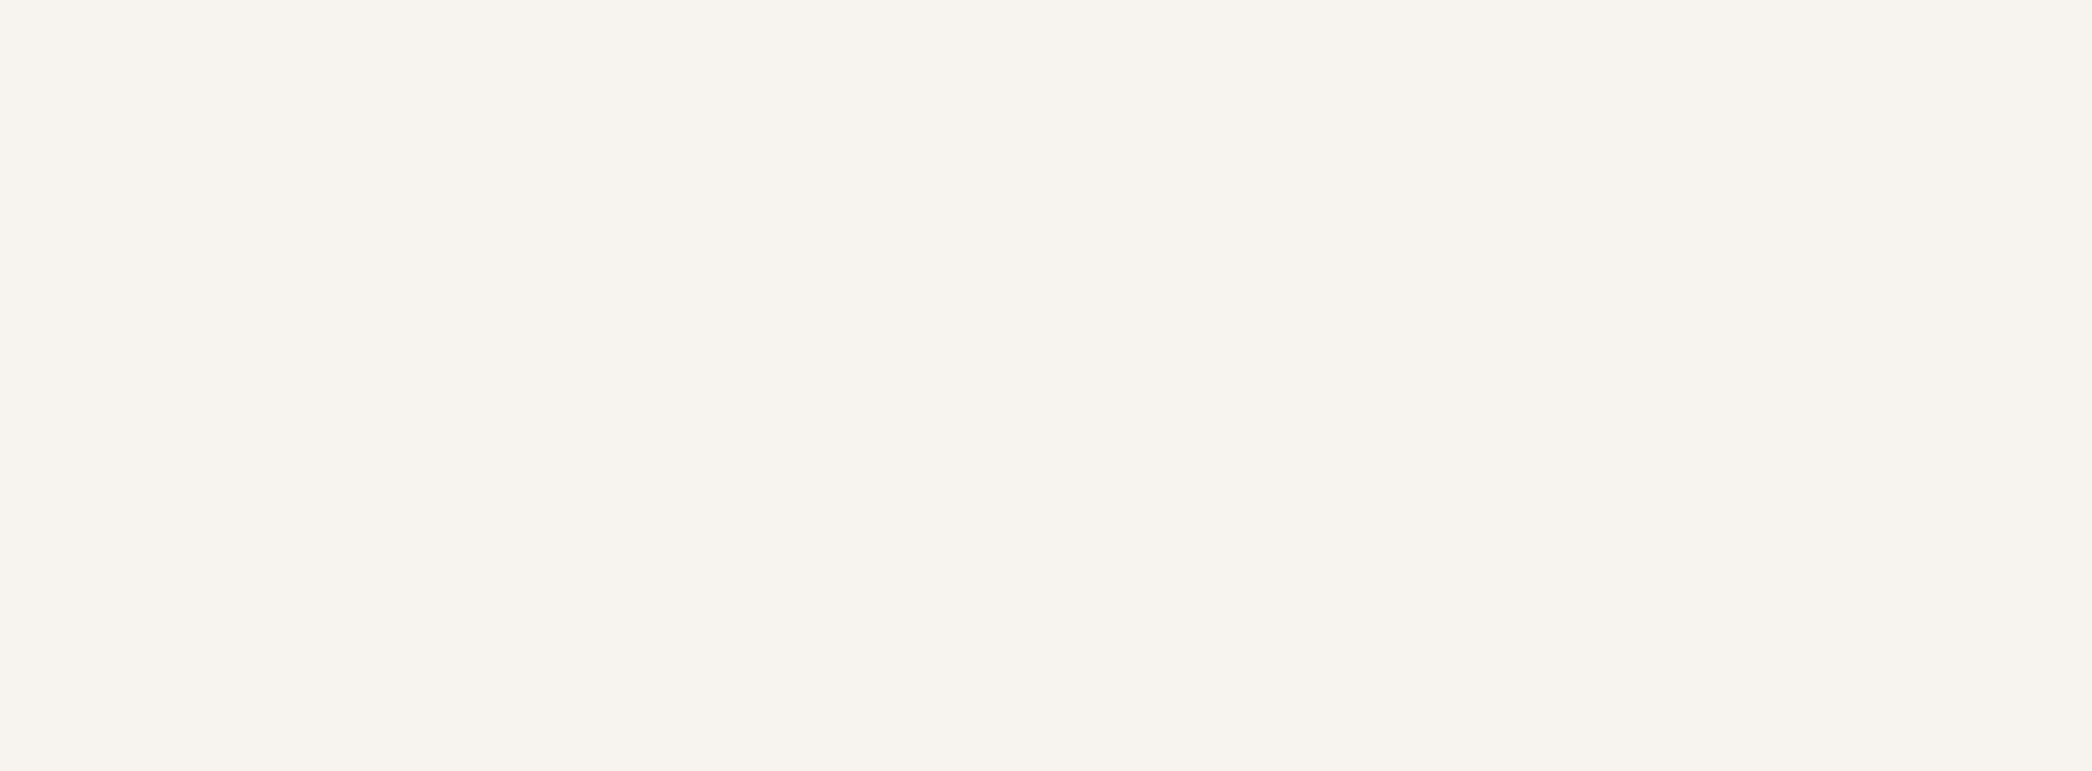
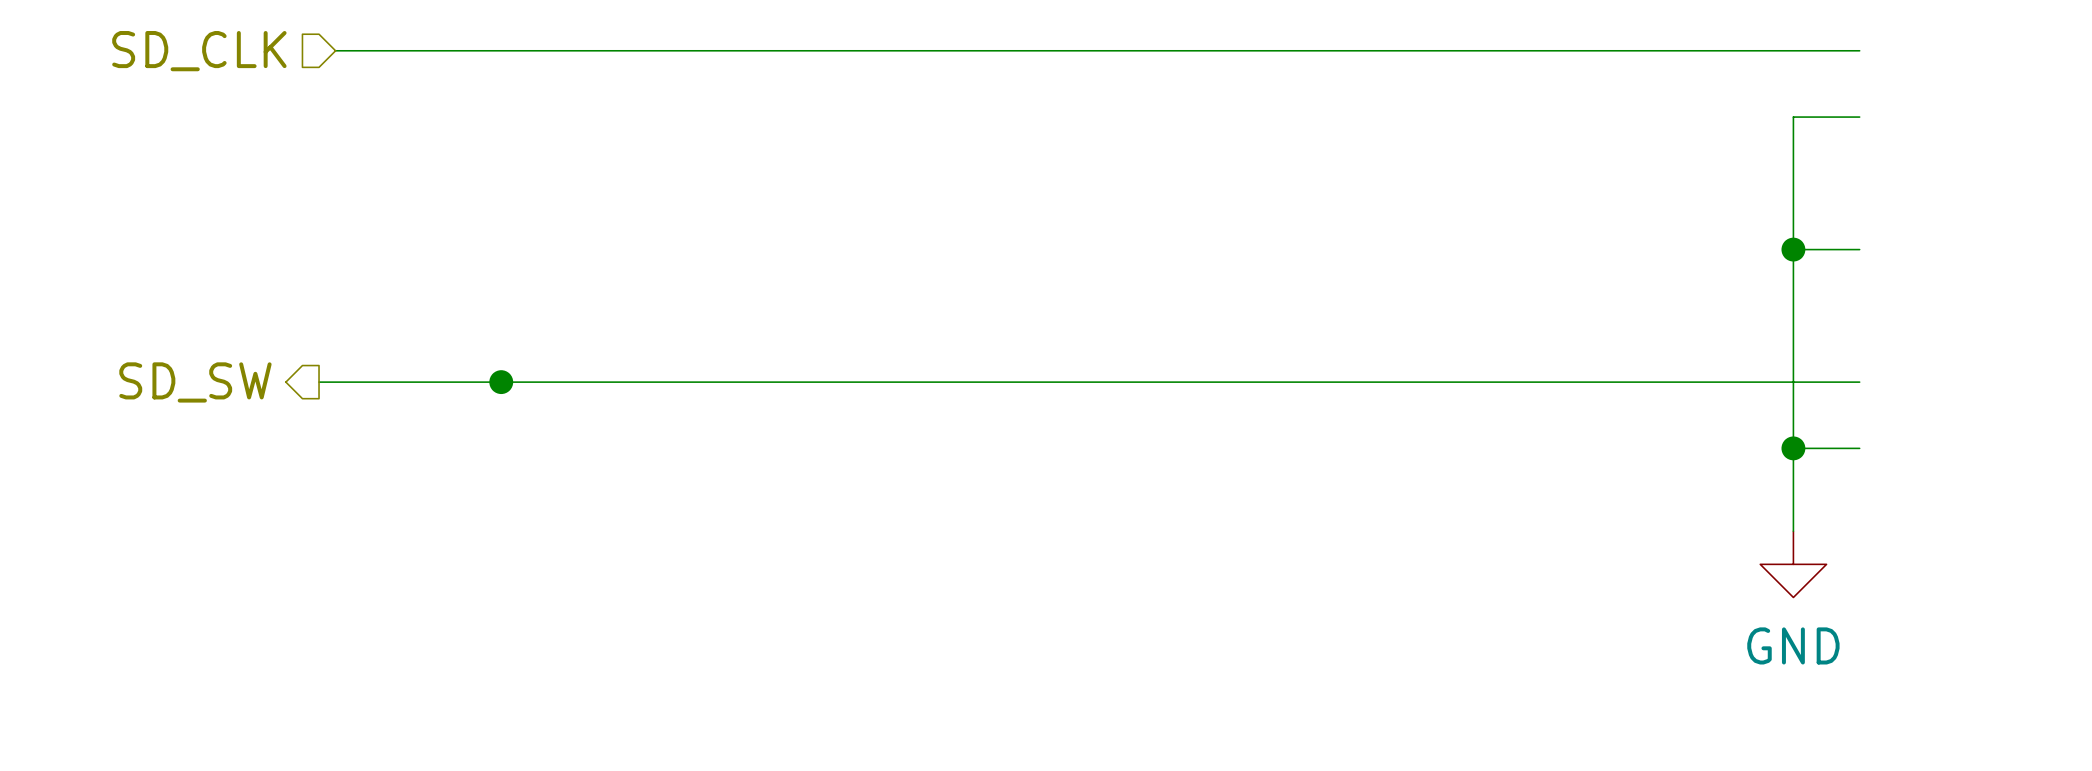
wire: none -> (335, 50) (1859, 50)
hierarchical label: none -> SD_CLK (199, 51)
wire: none -> (1859, 117) (1793, 117) (1793, 531)
wire: none -> (1793, 249) (1859, 249)
junction: none -> (1793, 249)
hierarchical label: none -> SD_SW (195, 382)
wire: none -> (319, 382) (1859, 382)
junction: none -> (501, 382)
wire: none -> (1793, 448) (1859, 448)
junction: none -> (1793, 448)
power symbol: none -> GND (1793, 564)

